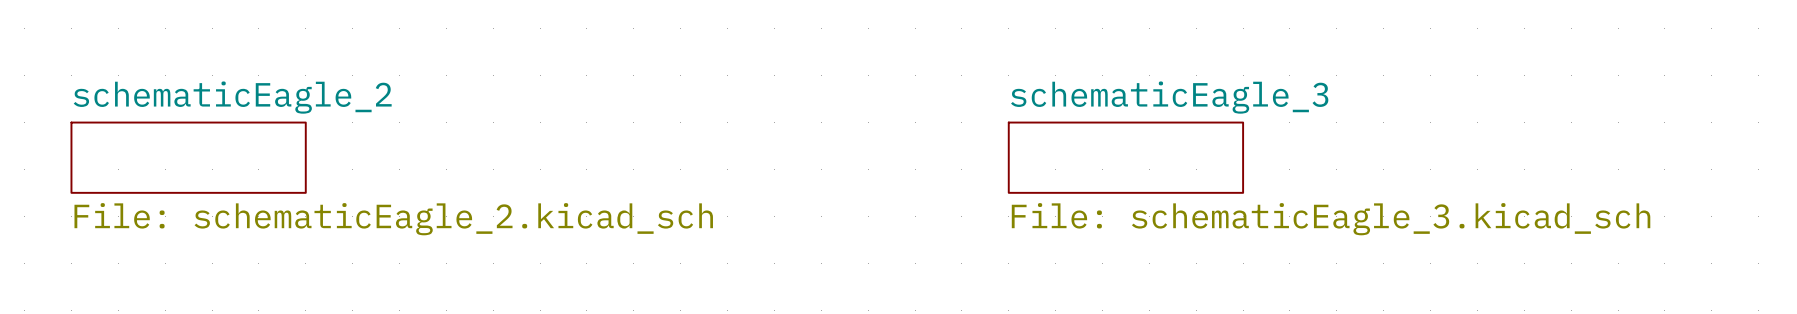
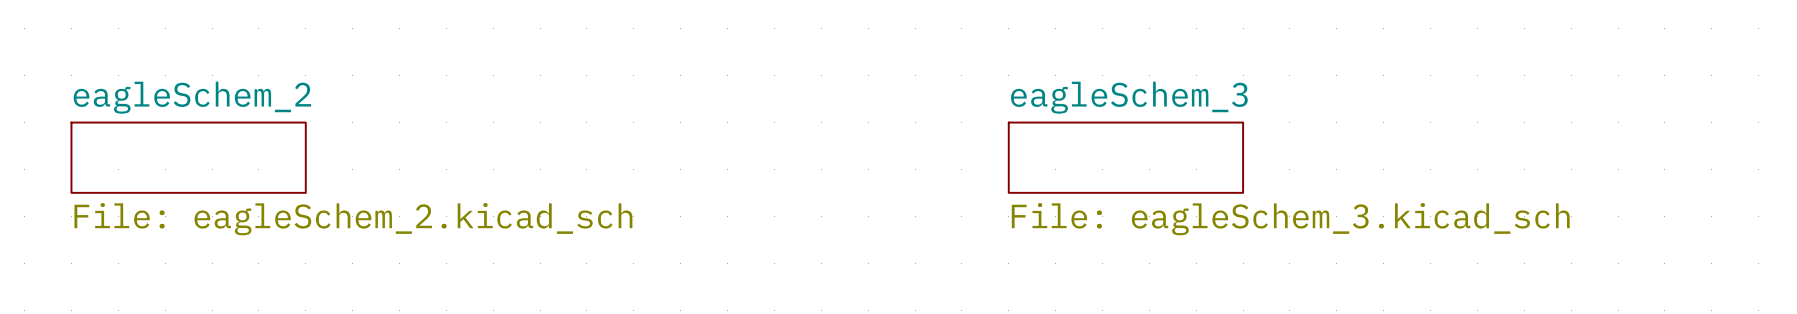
sheet schematicEagle_2 name: schematicEagle_2 (232, 97) -> eagleSchem_2 (192, 97)
sheet schematicEagle_3 name: schematicEagle_3 (1169, 97) -> eagleSchem_3 (1129, 97)
sheet schematicEagle_2 value: File: schematicEagle_2.kicad_sch (393, 219) -> File: eagleSchem_2.kicad_sch (353, 219)
sheet schematicEagle_3 value: File: schematicEagle_3.kicad_sch (1331, 219) -> File: eagleSchem_3.kicad_sch (1290, 219)

